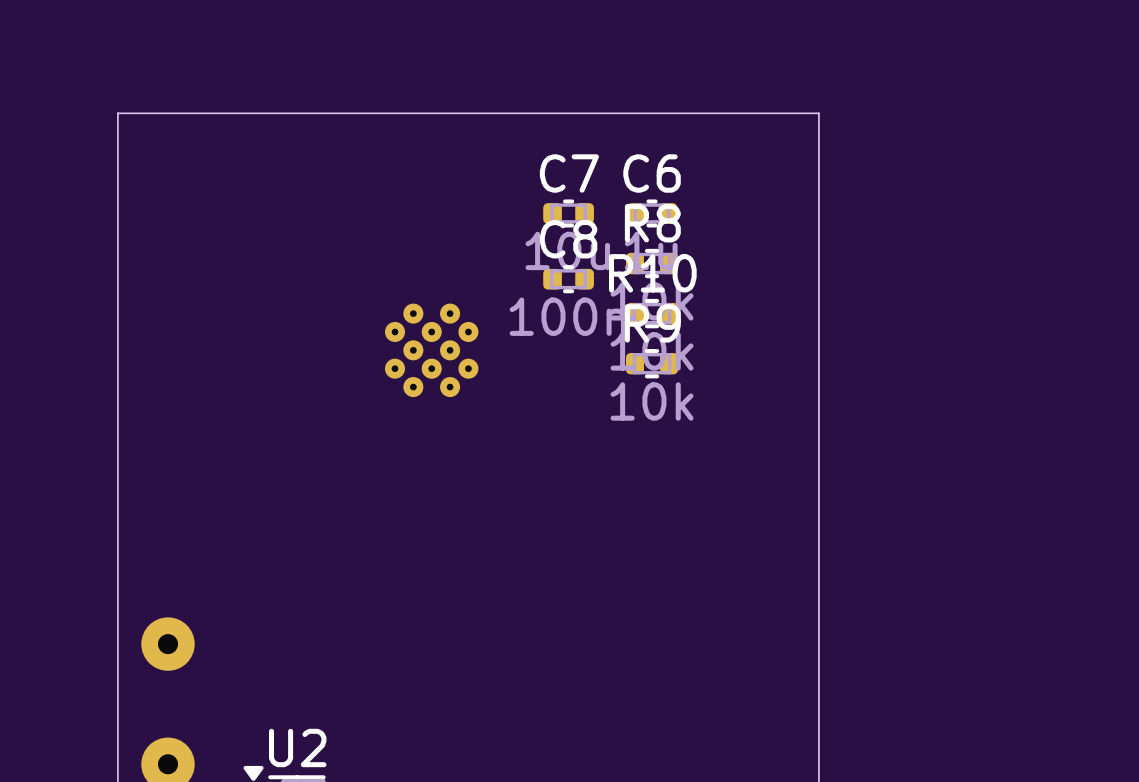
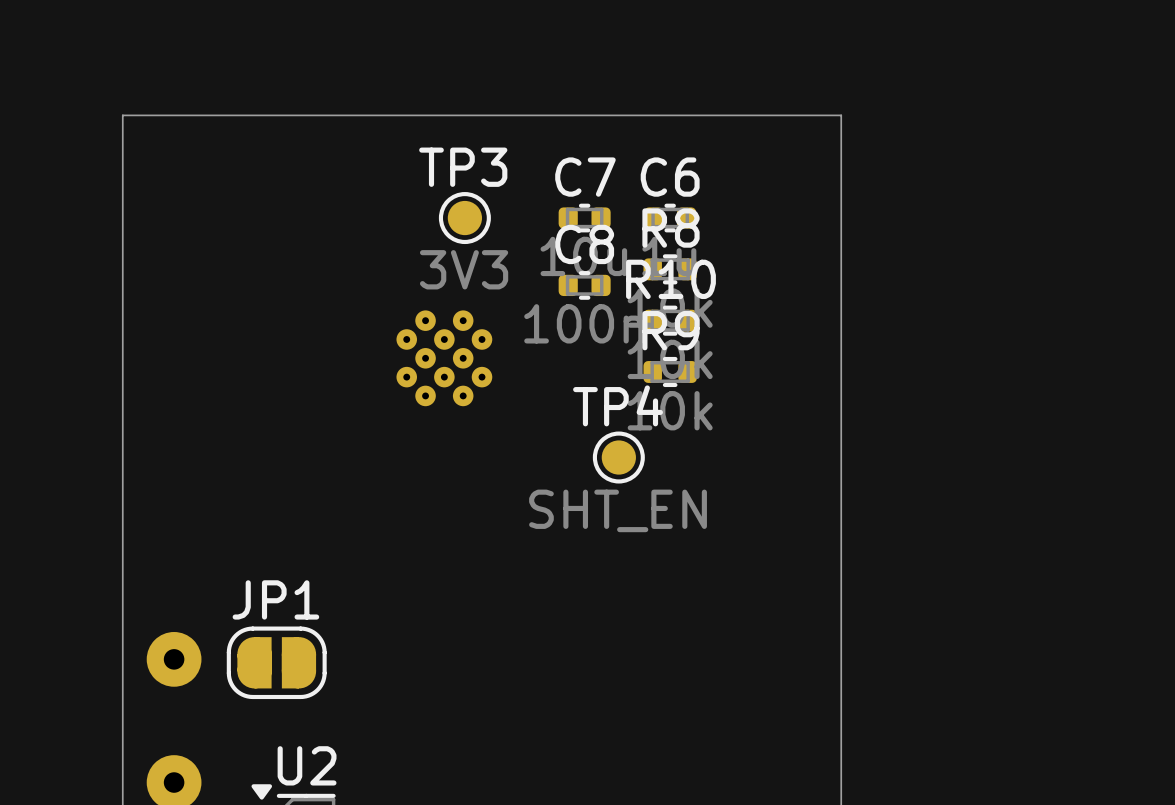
TP3: none -> 3V3 (464, 218)
TP4: none -> SHT_EN (618, 457)
JP1: none -> (276, 662)

